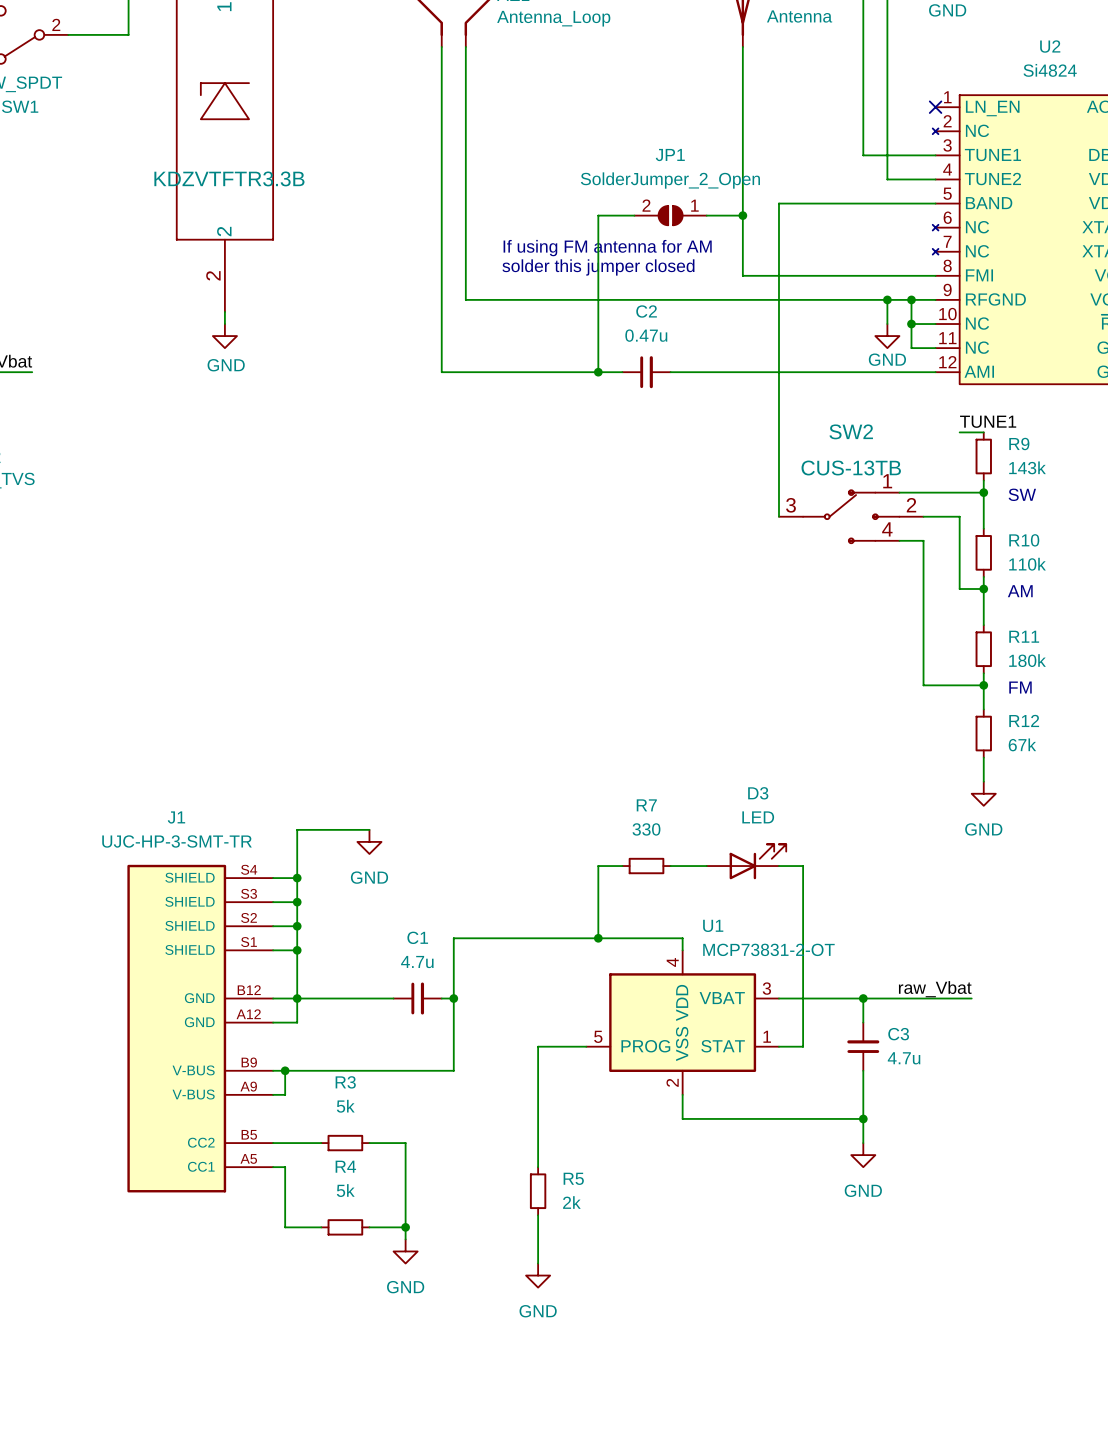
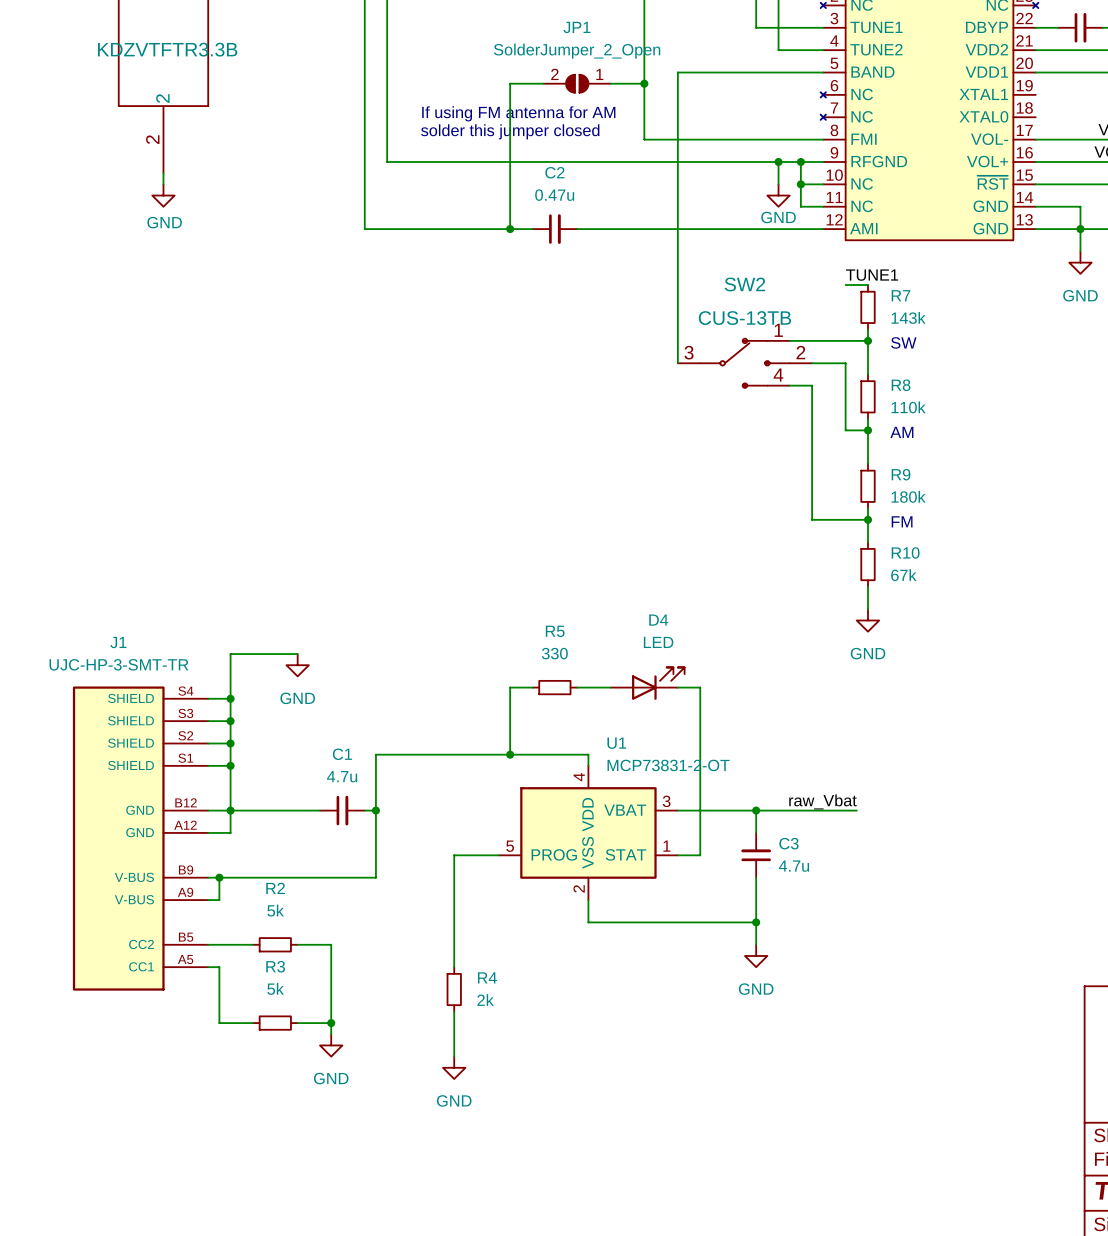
R9 name: R9 (1019, 444) -> R7 (901, 295)
R10 name: R10 (1024, 540) -> R8 (901, 385)
R11 name: R11 (1024, 636) -> R9 (901, 474)
R12 name: R12 (1024, 720) -> R10 (905, 552)
D3 name: D3 (758, 793) -> D4 (658, 620)
R7 name: R7 (646, 805) -> R5 (555, 631)
R3 name: R3 (345, 1082) -> R2 (275, 888)
R4 name: R4 (345, 1166) -> R3 (275, 966)
R5 name: R5 (573, 1178) -> R4 (487, 977)

